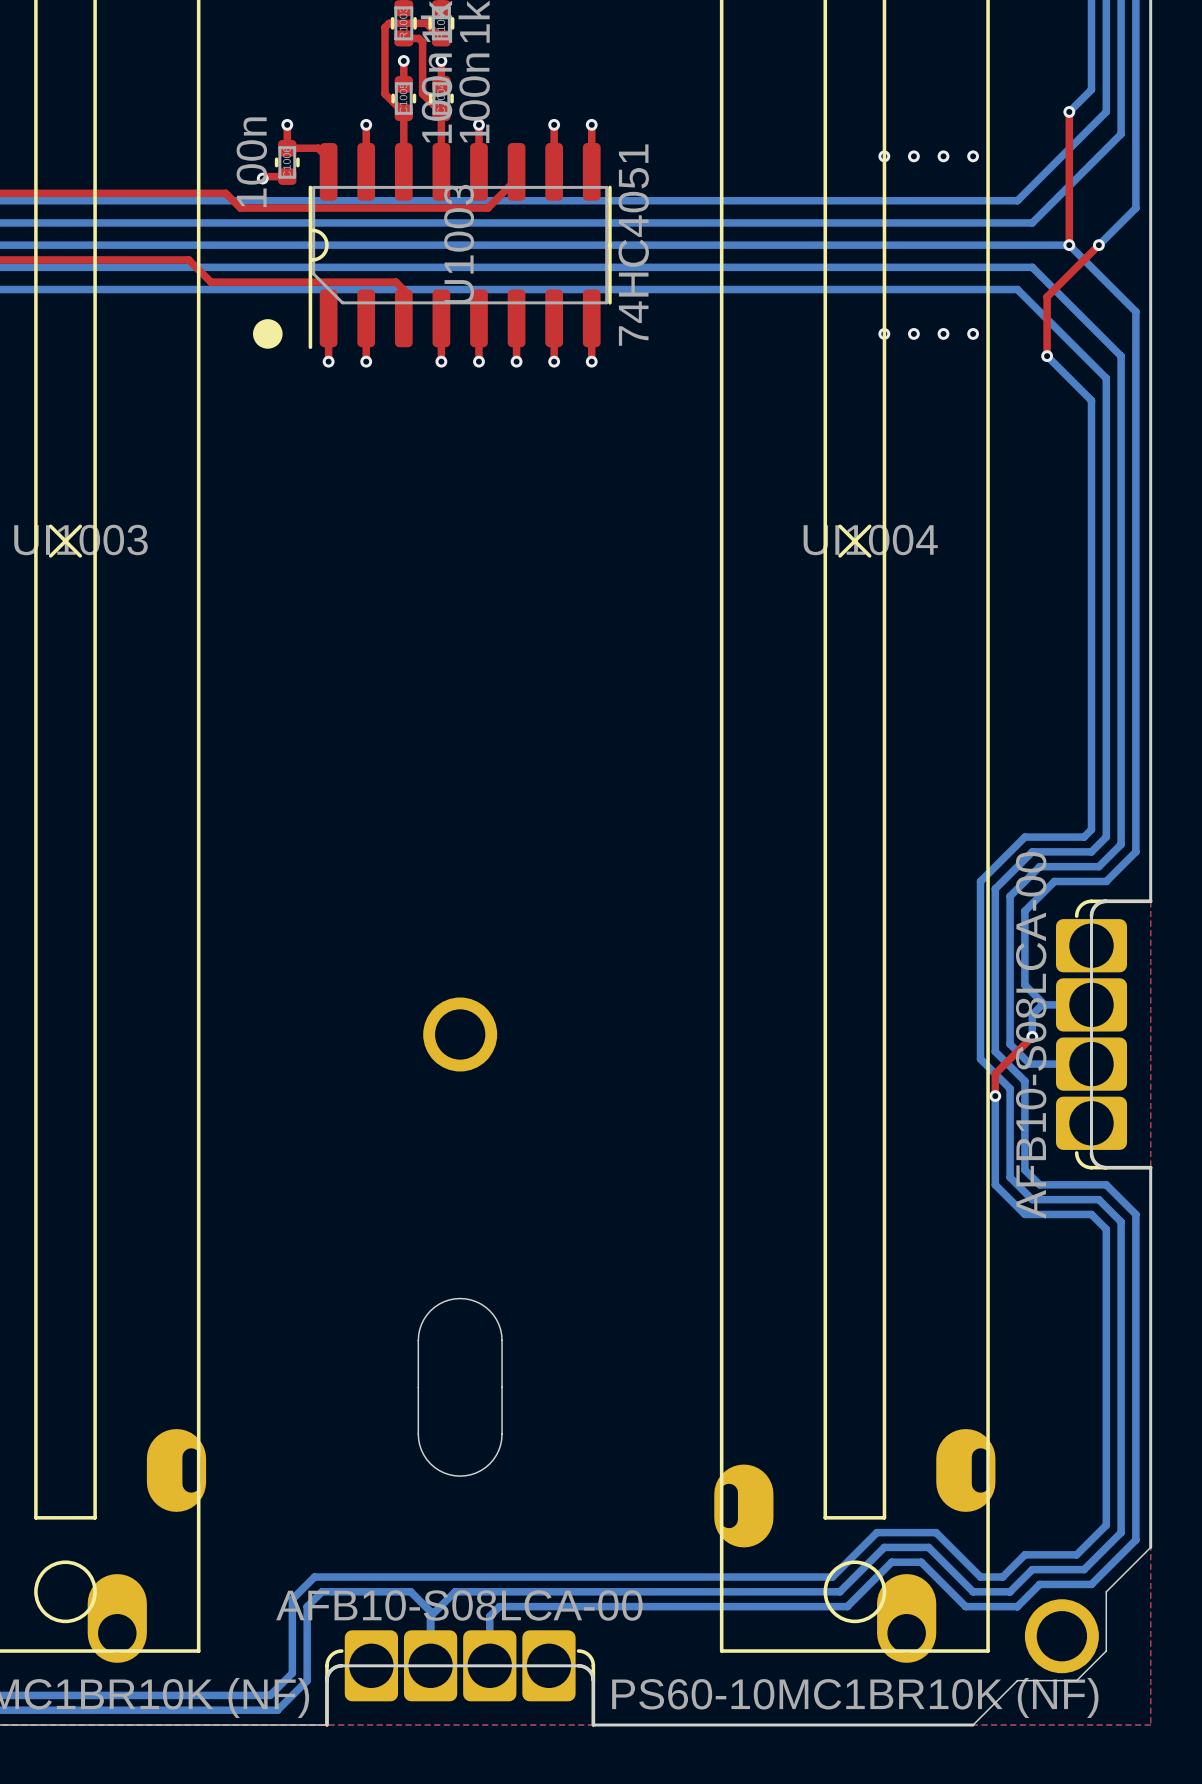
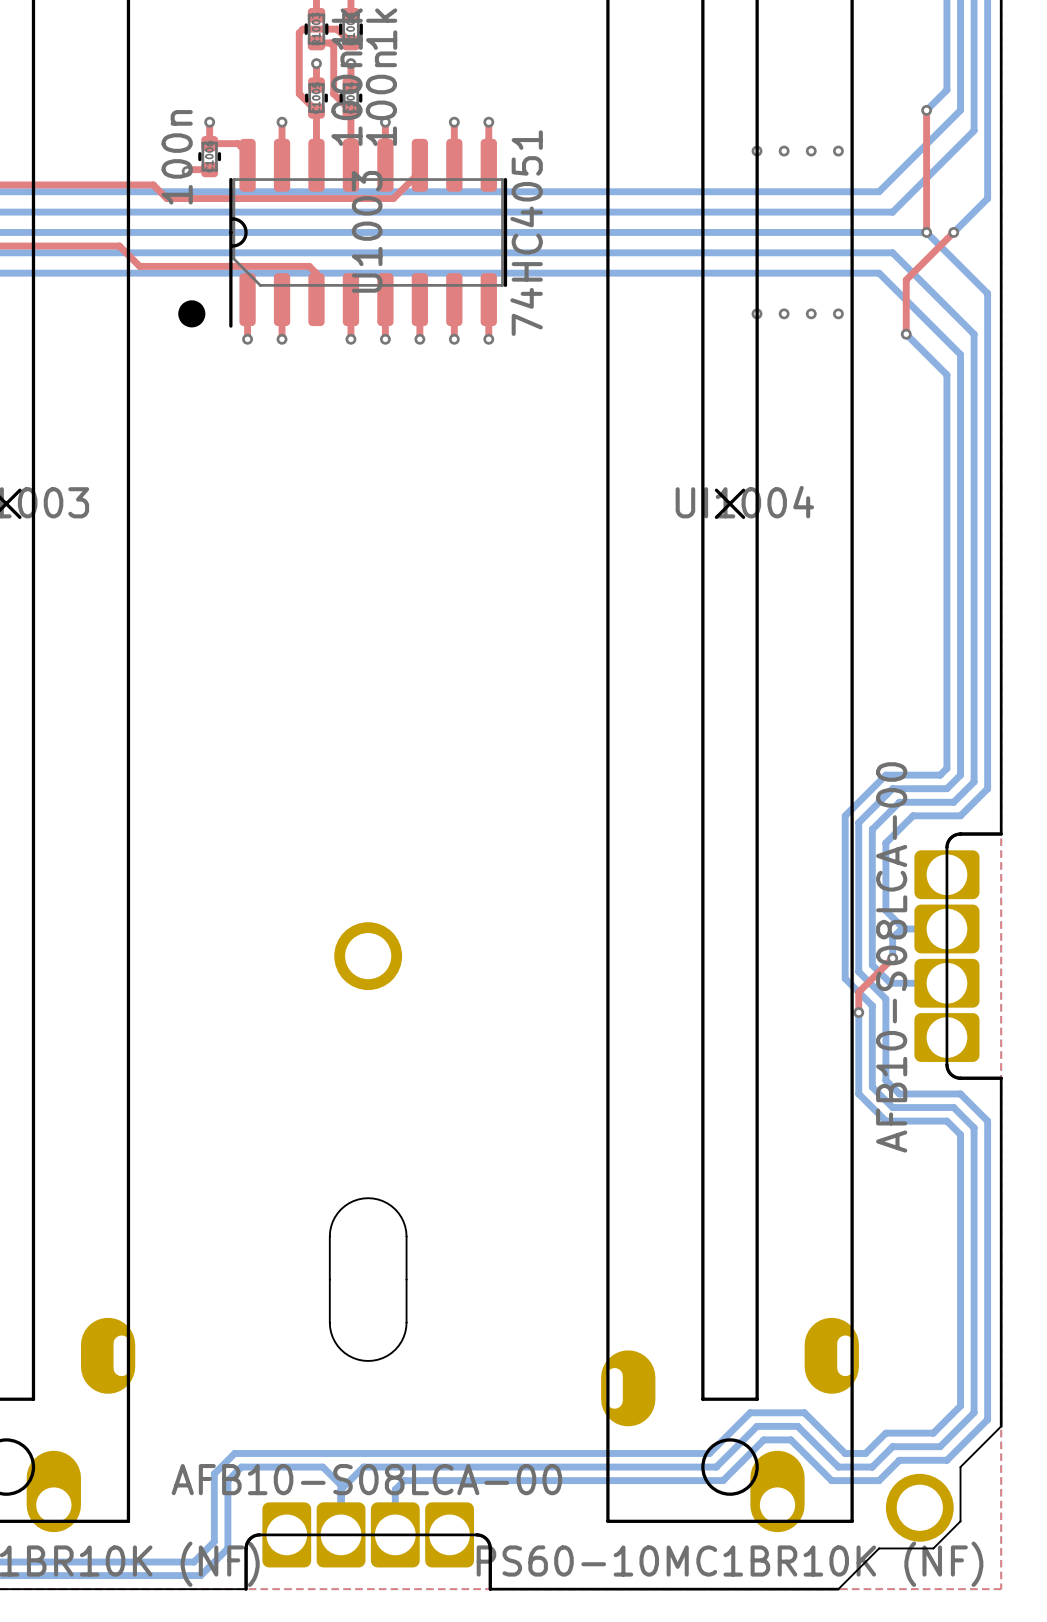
part footprint: [1055, 899, 1153, 1170] -> [914, 832, 1003, 1080]
part footprint: [325, 1630, 596, 1727] -> [244, 1502, 492, 1591]

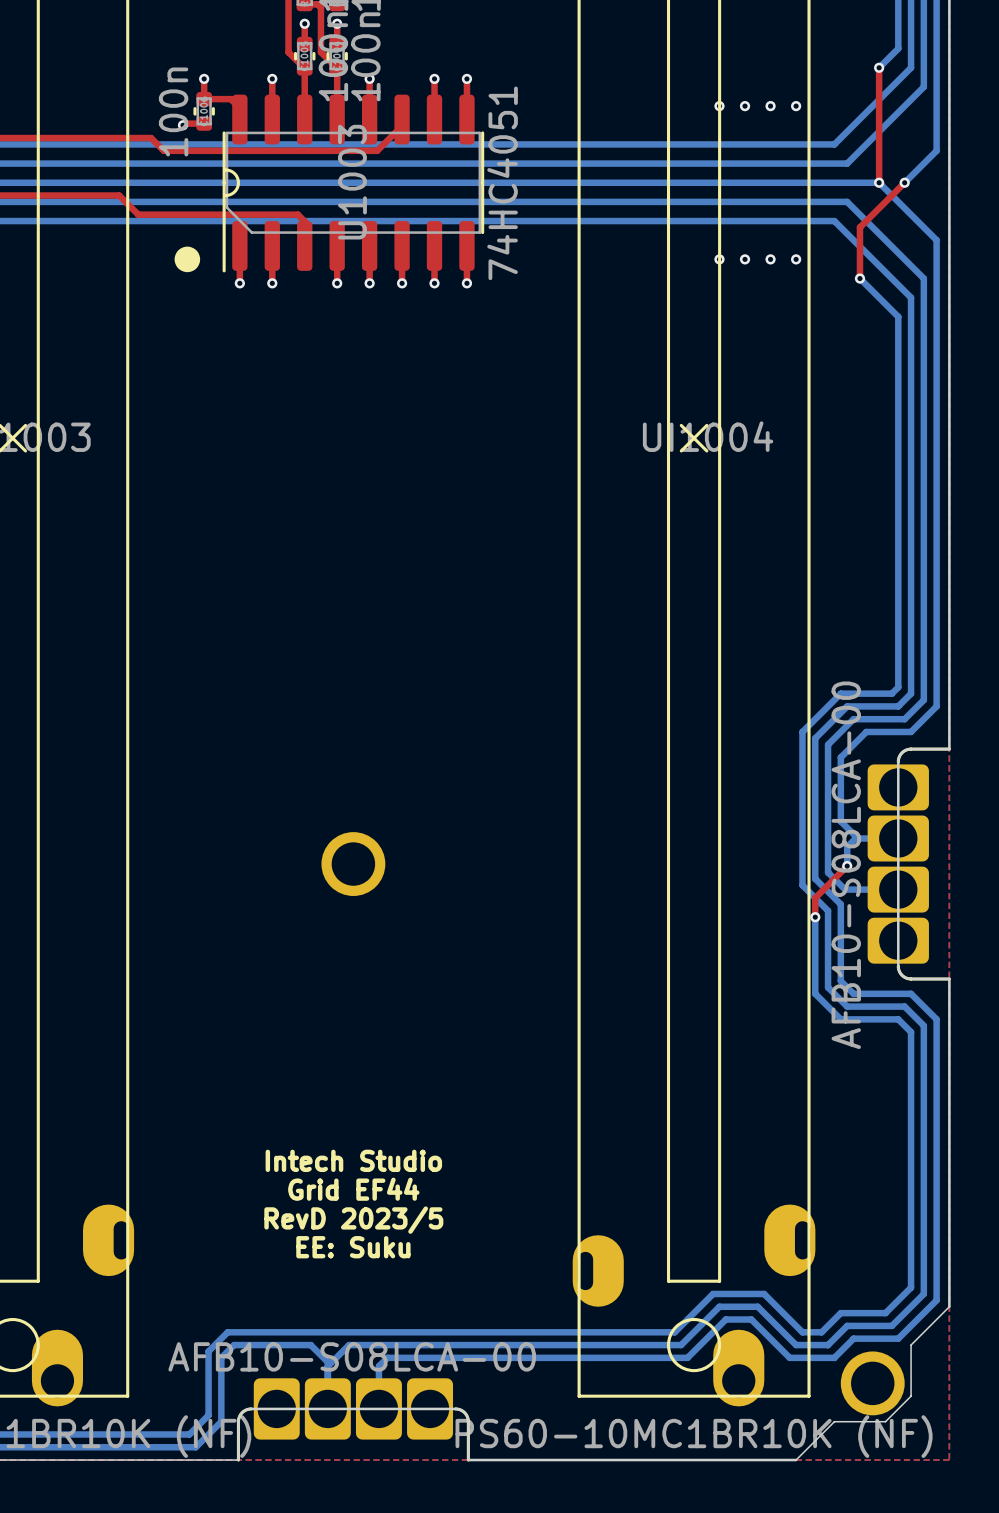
board edge: (329, 1236) (329, 1322) (332, 1337) (341, 1349) (353, 1358) (368, 1360) (382, 1358) (398, 1345) (406, 1327) (406, 1236) (403, 1221) (395, 1209) (387, 1203) (373, 1198) (363, 1198) (348, 1203) (337, 1213) (332, 1221) (329, 1236) -> none
text: none -> Intech Studio (353, 1160)
text: none -> Grid EF44 (353, 1189)
text: none -> RevD 2023/5 (353, 1220)
text: none -> EE: Suku (353, 1247)

